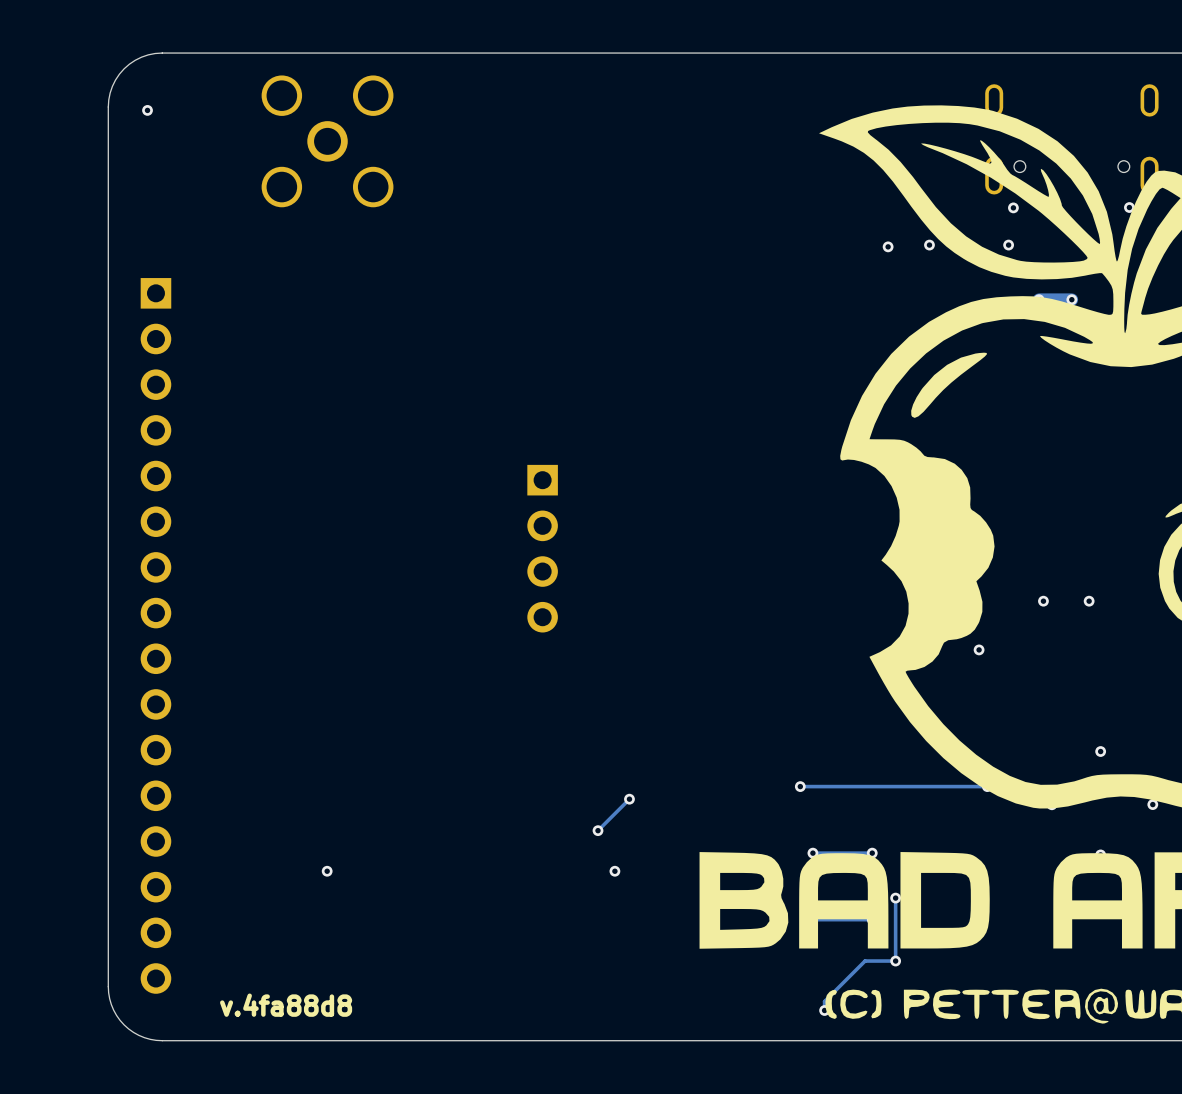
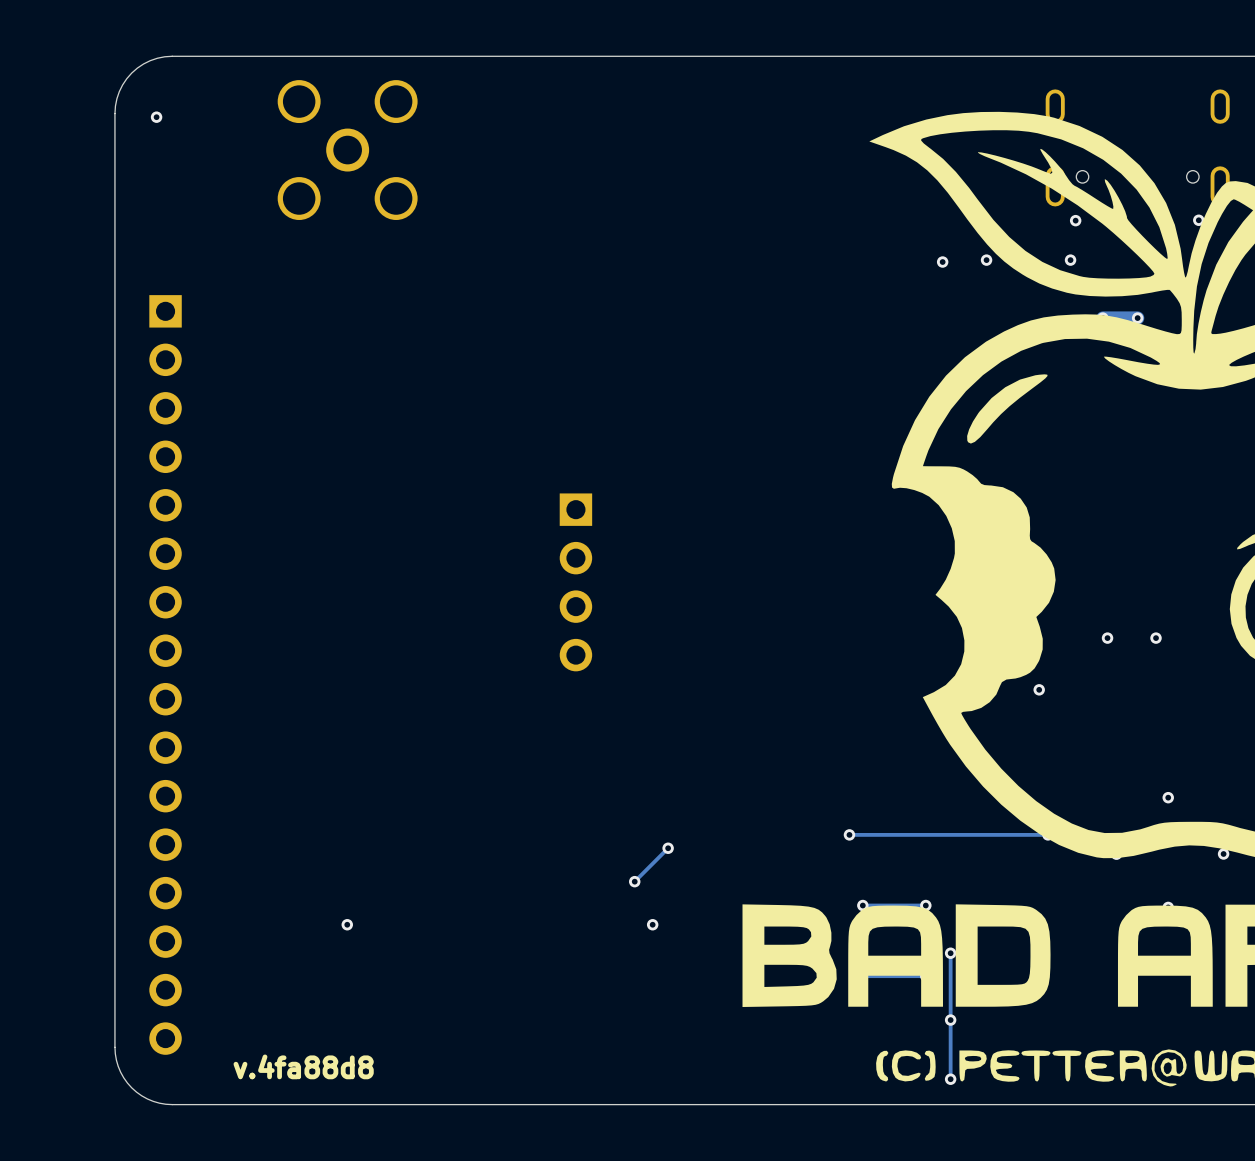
track: (895, 961) (865, 961) (824, 1001) (824, 1010) -> (950, 1020) (950, 1079)
via position: (824, 1010) -> (950, 1079)

